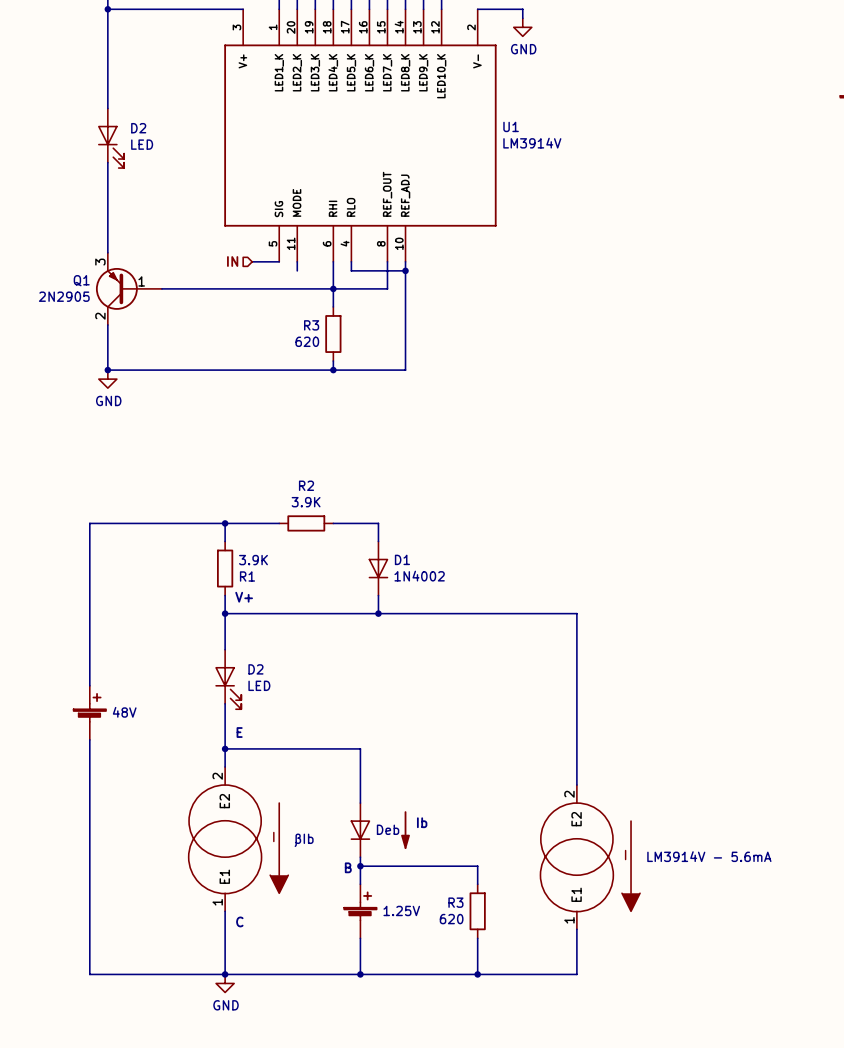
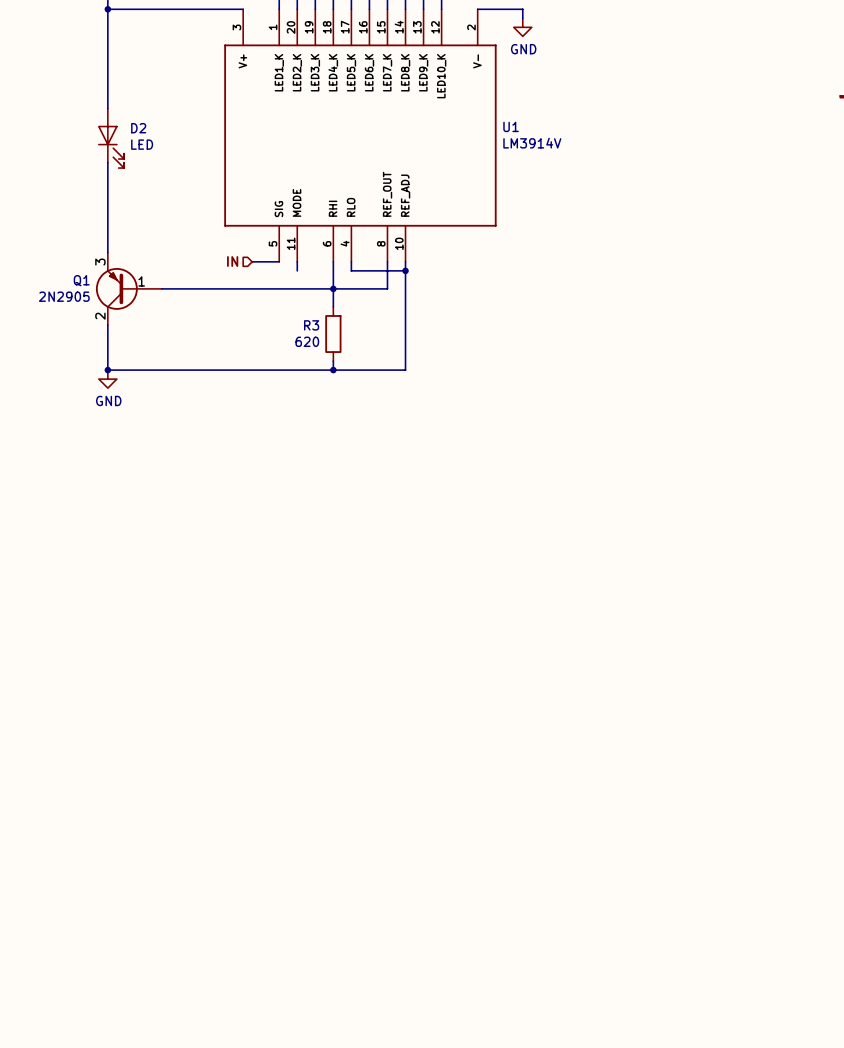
wire: (225, 523) (225, 541) -> none
junction: (225, 523) -> none
wire: (279, 523) (89, 523) (89, 685) -> none
R2: 3.9K (306, 523) -> none
wire: (333, 523) (378, 523) (378, 541) -> none
R1: 3.9K (225, 568) -> none
D1: 1N4002 (378, 568) -> none
wire: (225, 595) (225, 649) -> none
wire: (378, 595) (378, 613) -> none
text: V+ (244, 597) -> none
wire: (225, 613) (576, 613) (576, 785) -> none
junction: (225, 613) -> none
junction: (378, 613) -> none
D2: LED (228, 679) -> none
wire: (225, 703) (225, 766) -> none
part: 48V (89, 712) -> none
text: E (239, 732) -> none
wire: (89, 739) (89, 974) (576, 974) (576, 929) -> none
wire: (225, 748) (360, 748) (360, 803) -> none
junction: (225, 748) -> none
text: Ib (422, 822) -> none
power symbol: (405, 829) -> none
part: Deb (360, 830) -> none
part: βIb (238, 839) -> none
wire: (360, 857) (360, 884) -> none
part: LM3914V - 5.6mA (590, 857) -> none
wire: (360, 866) (477, 866) (477, 884) -> none
junction: (360, 866) -> none
text: B (348, 867) -> none
wire: (225, 911) (225, 974) -> none
part: 1.25V (360, 911) -> none
R3: 620 (477, 911) -> none
text: C (239, 921) -> none
wire: (360, 938) (360, 974) -> none
wire: (477, 938) (477, 974) -> none
junction: (225, 974) -> none
junction: (360, 974) -> none
junction: (477, 974) -> none
power symbol: GND (225, 983) -> none

